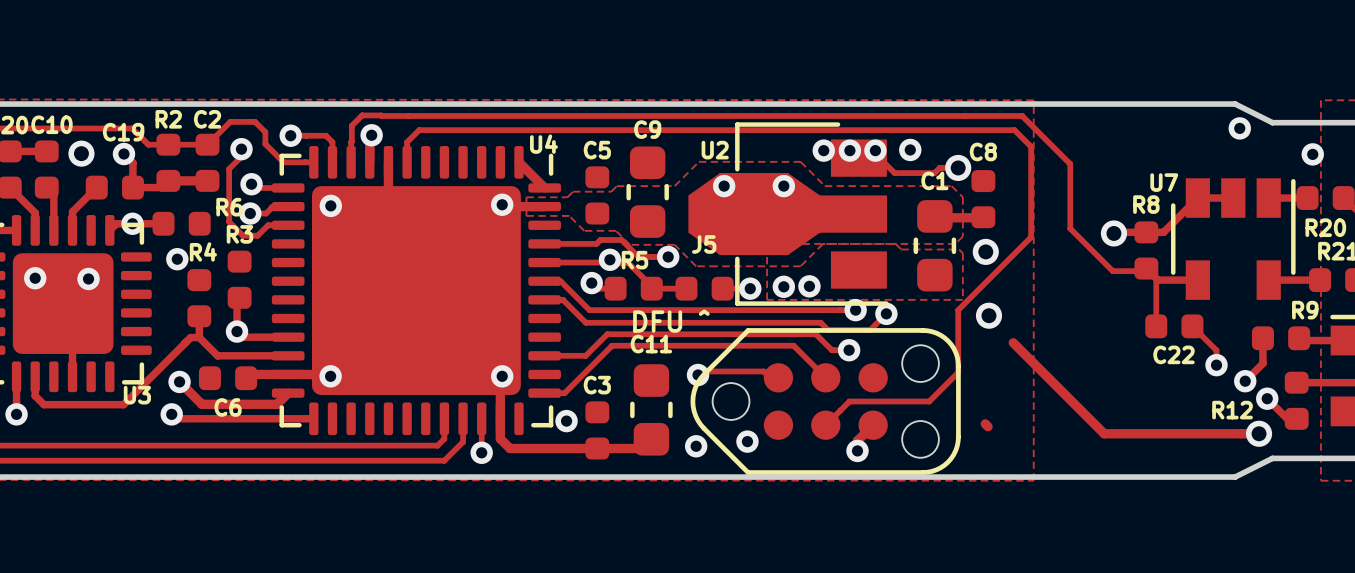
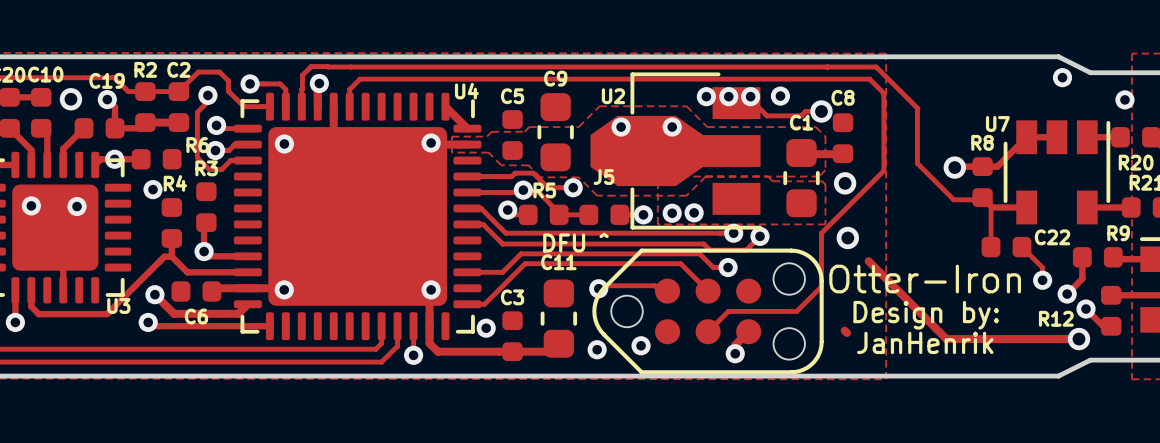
C22 name position: C22 (1173, 354) -> C22 (1052, 237)
text: none -> Otter-Iron (925, 279)
text: none -> Design by: (926, 315)
text: none -> JanHenrik (925, 342)

